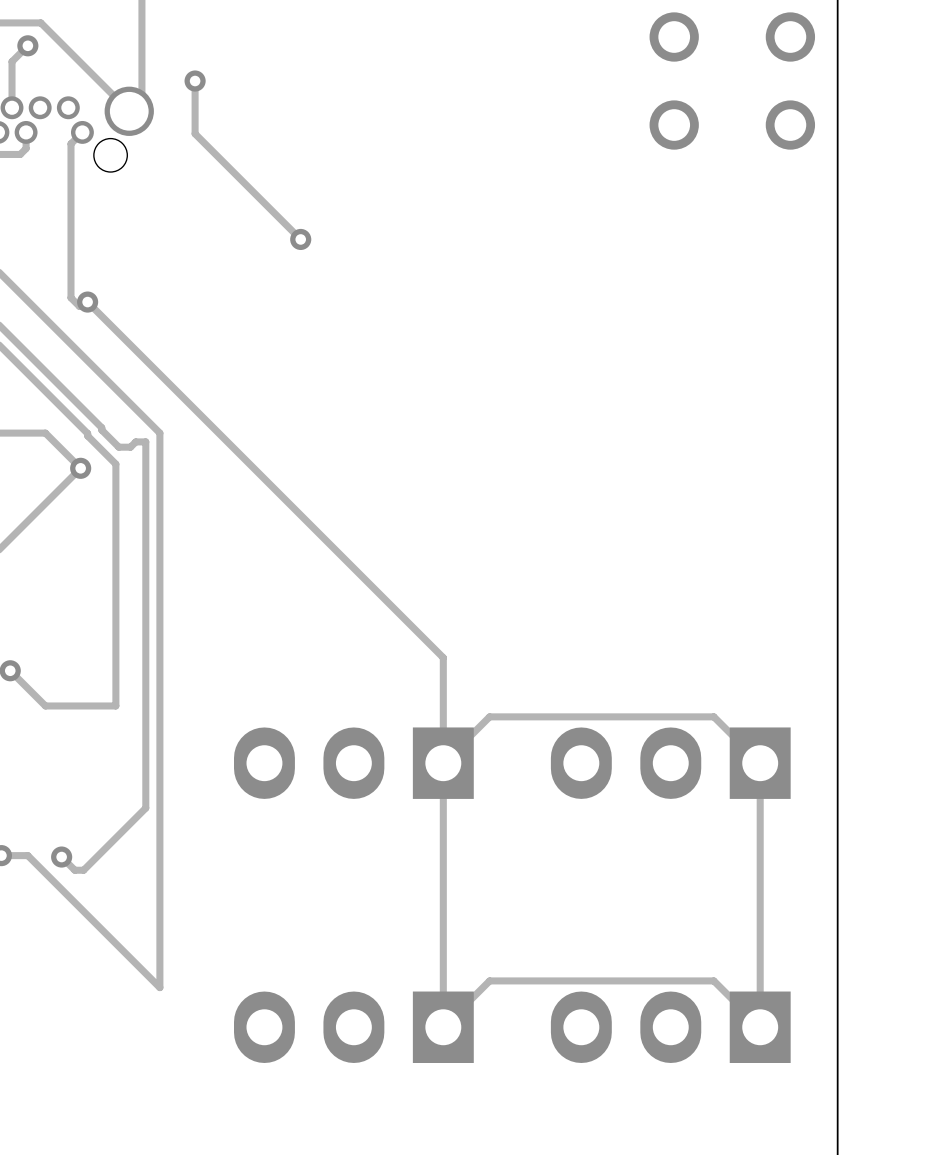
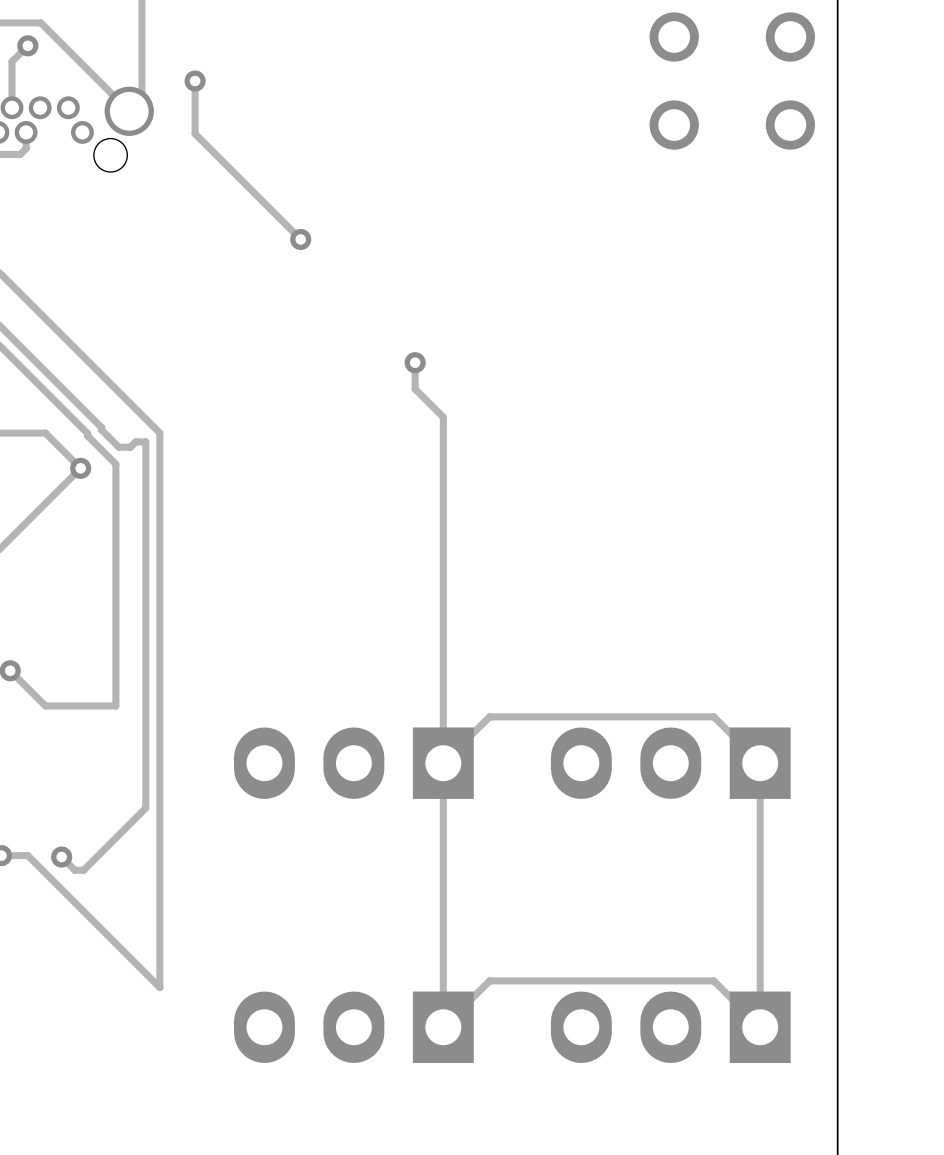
track: (82, 132) (70, 143) (70, 297) (79, 306) (83, 306) (87, 302) (443, 657) -> (415, 362) (415, 389) (443, 417) (443, 657)
via: (87, 302) -> none
via: none -> (415, 362)

